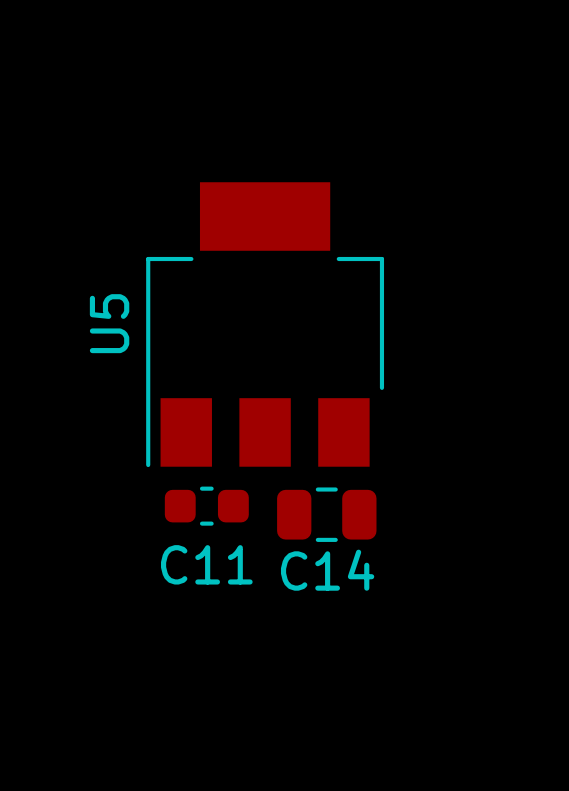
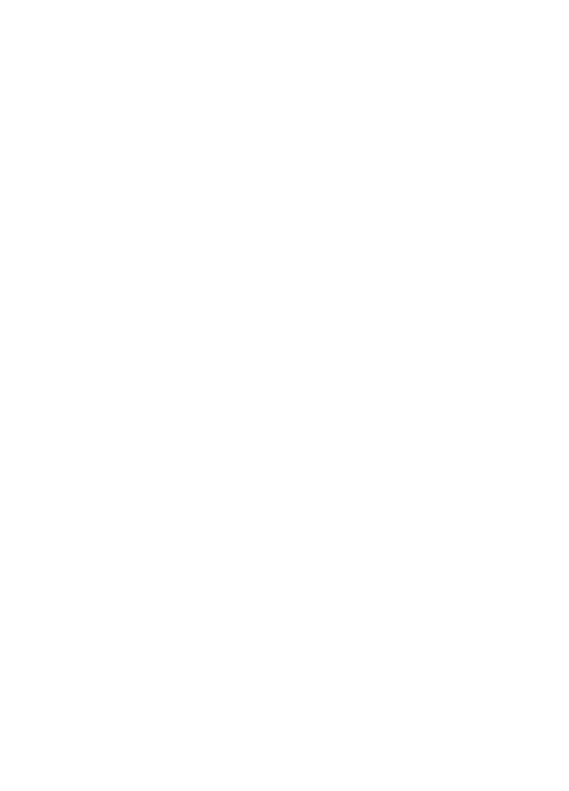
U5: (265, 324) -> none
C11: (206, 506) -> none
C14: (326, 514) -> none

